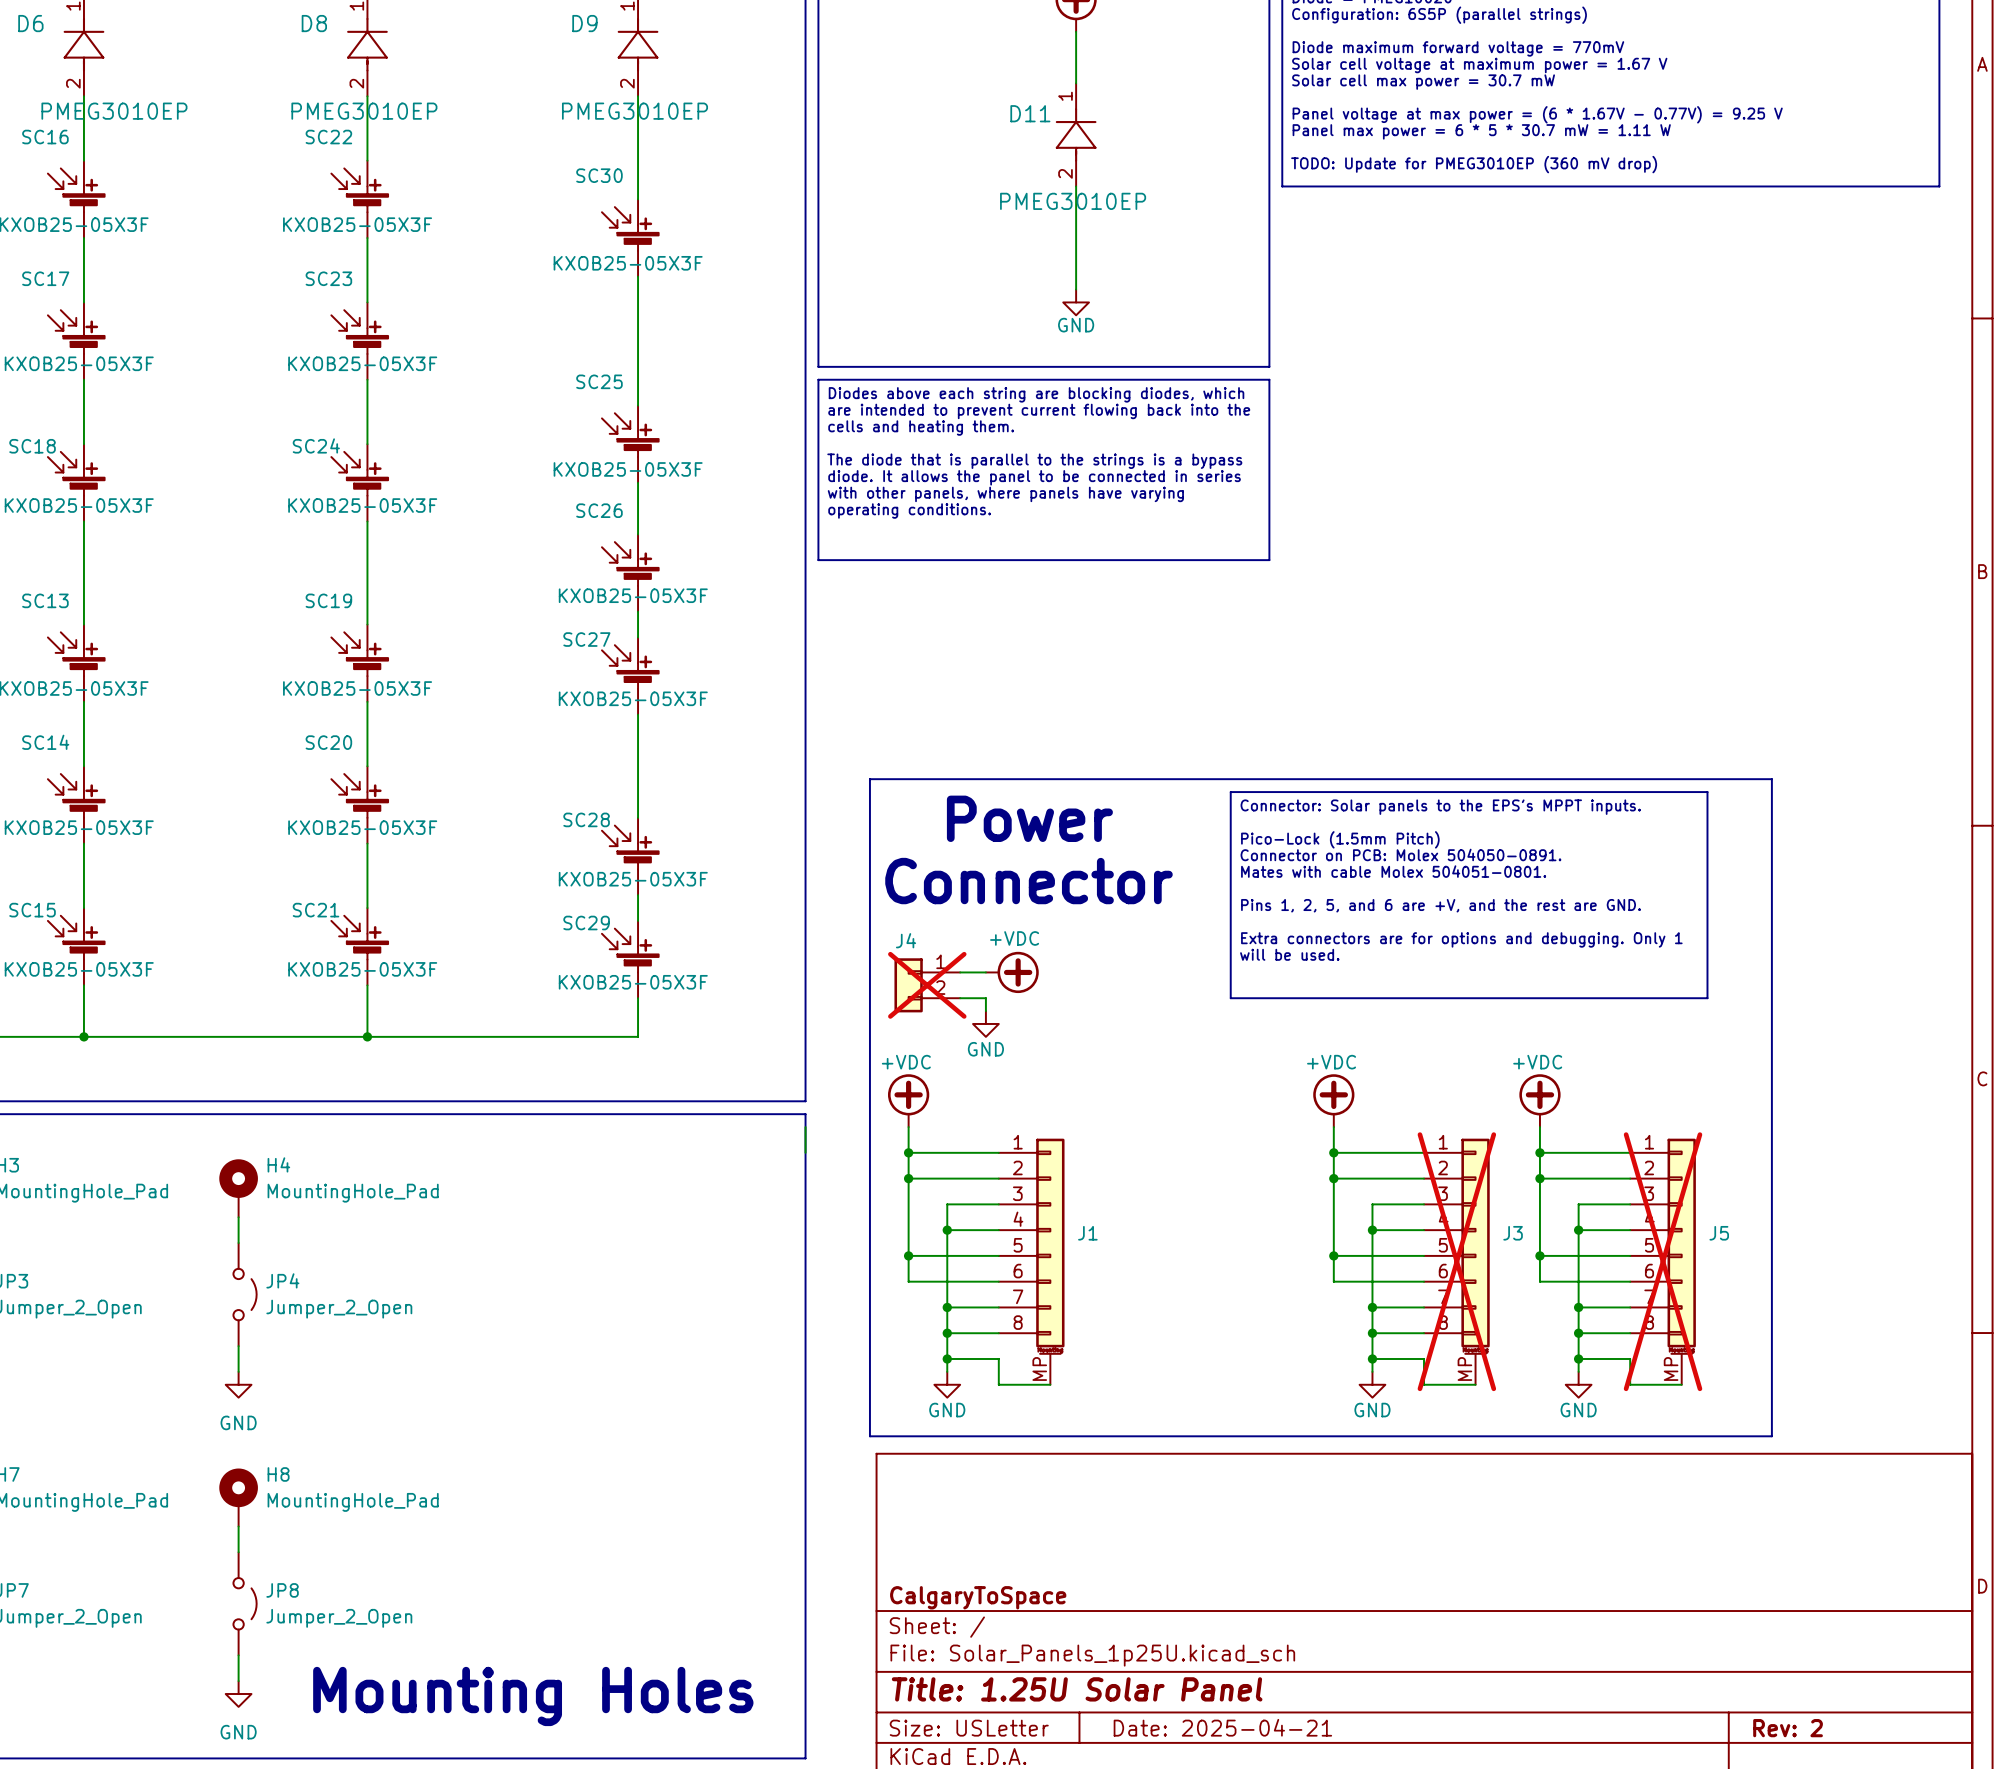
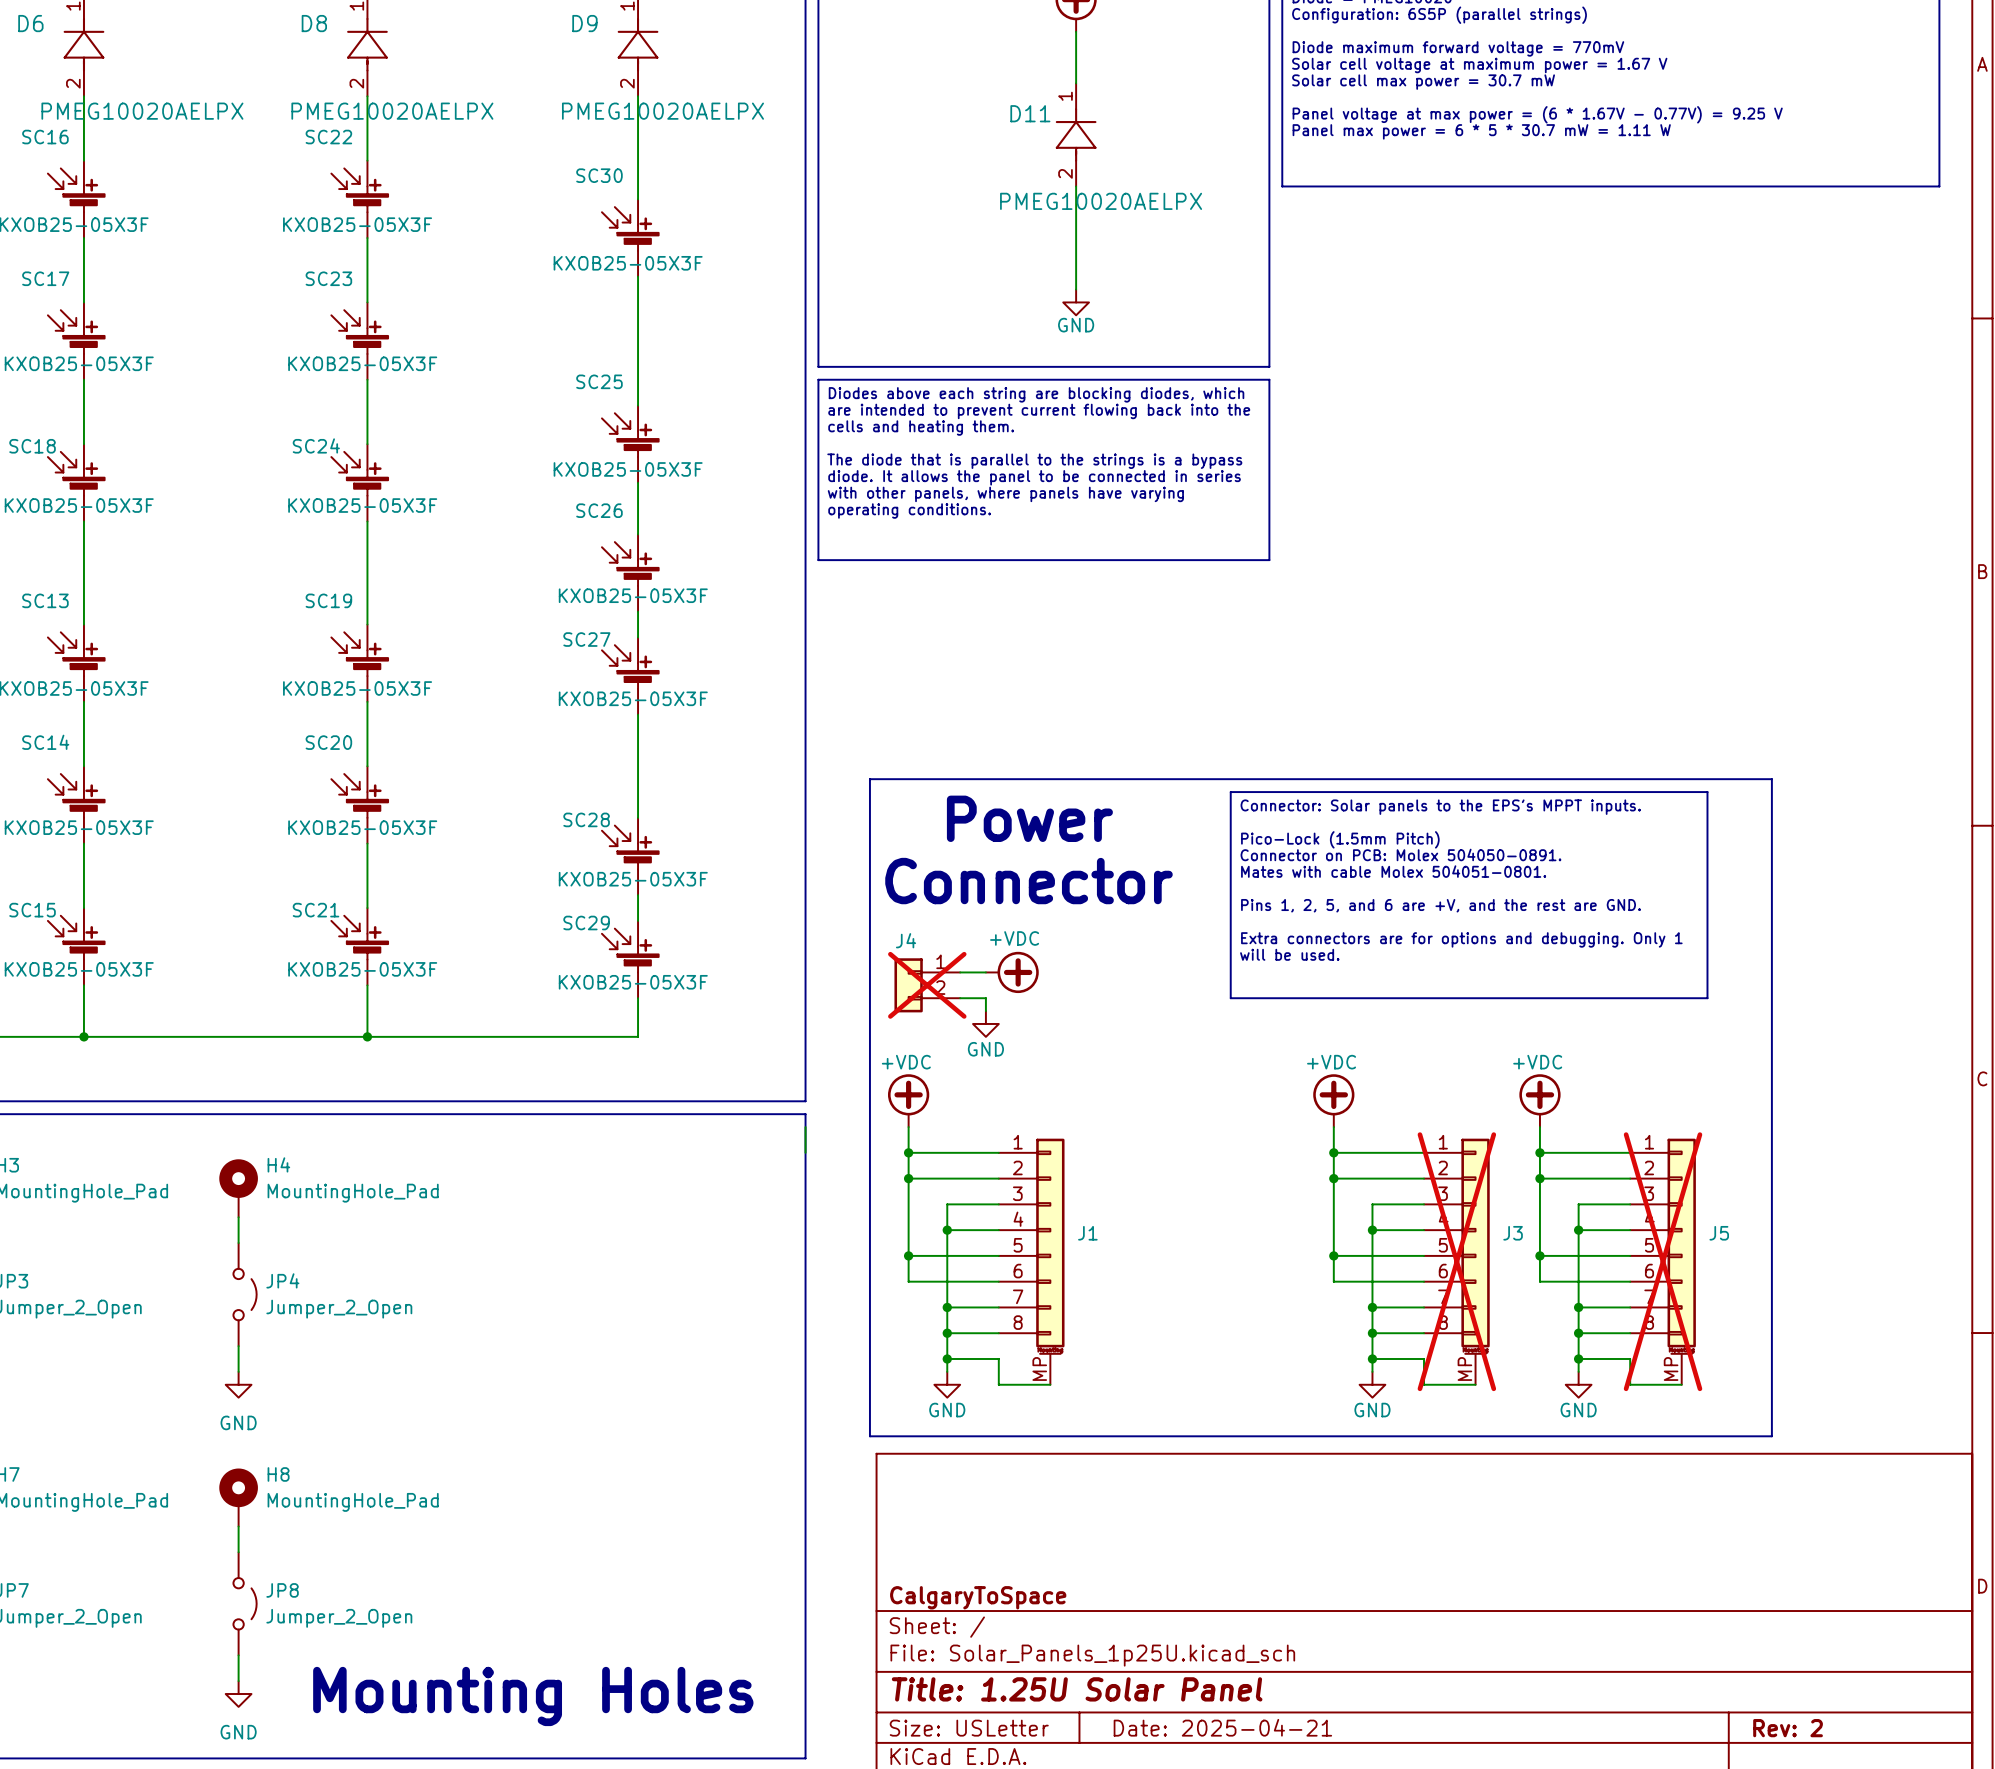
D6 value: PMEG3010EP (114, 111) -> PMEG10020AELPX (142, 111)
D8 value: PMEG3010EP (364, 111) -> PMEG10020AELPX (392, 111)
D9 value: PMEG3010EP (635, 111) -> PMEG10020AELPX (662, 111)
text: TODO: Update for PMEG3010EP (360 mV drop) (1474, 164) -> none
D11 value: PMEG3010EP (1073, 201) -> PMEG10020AELPX (1101, 201)

